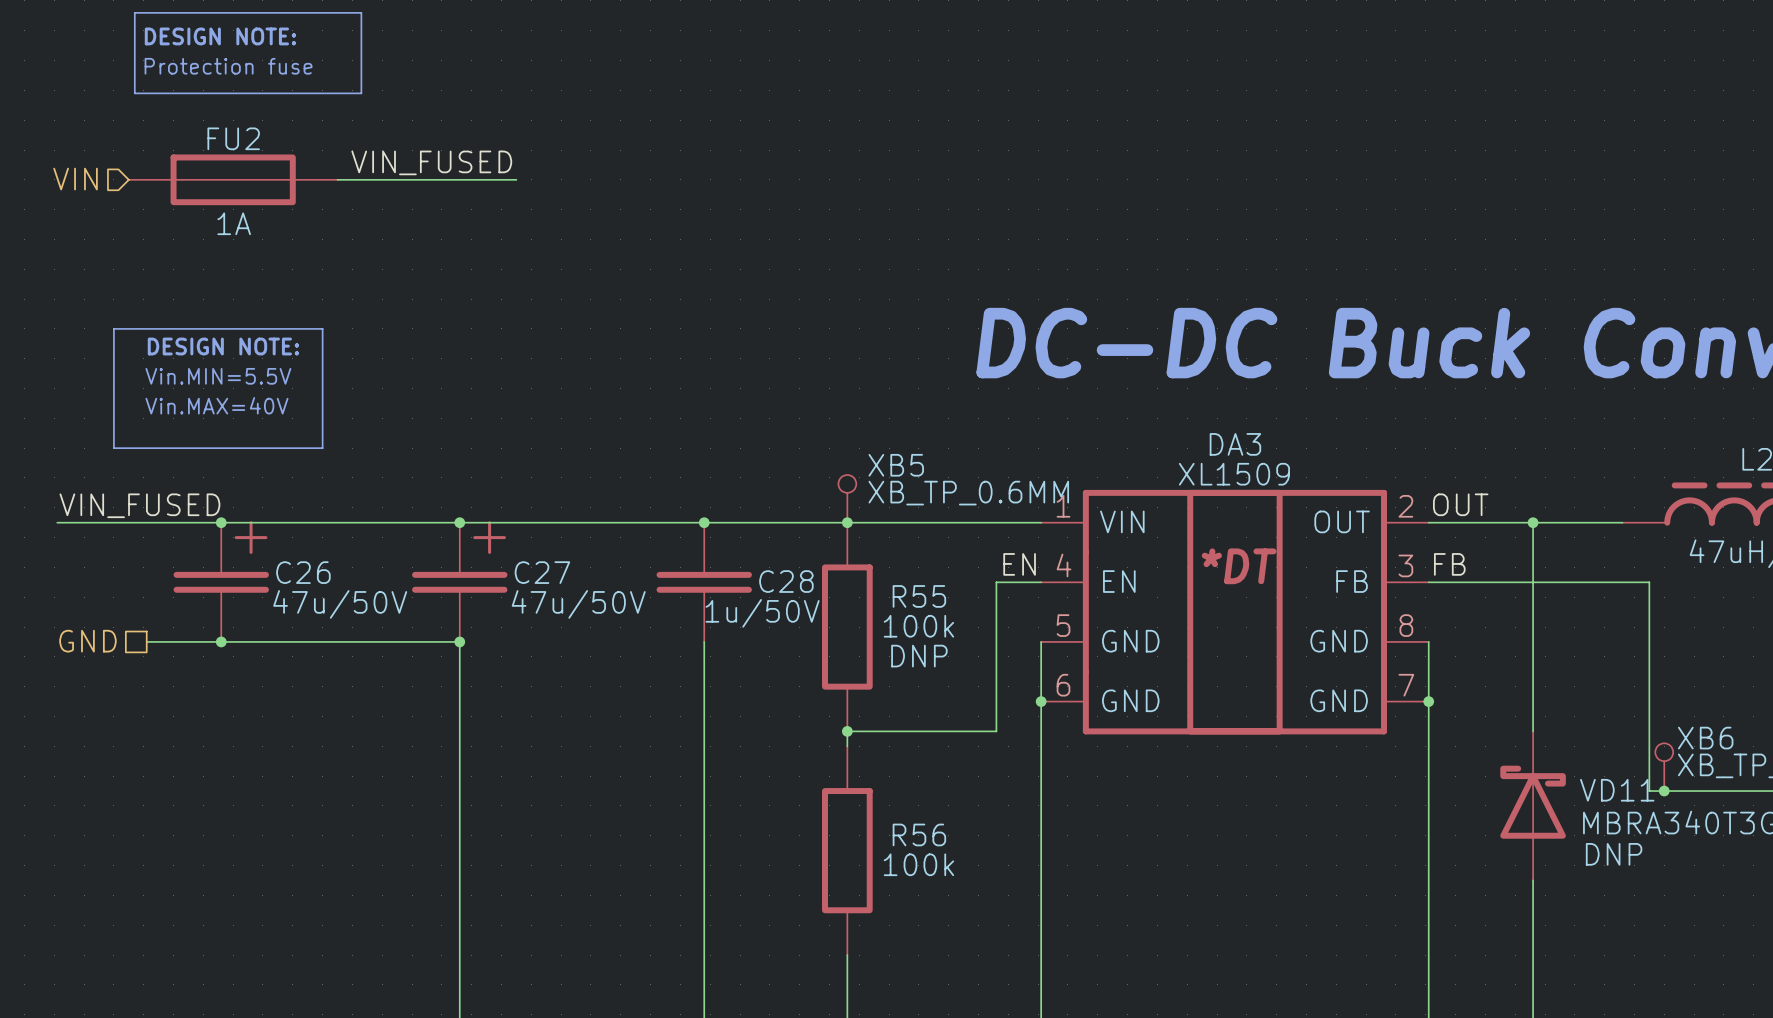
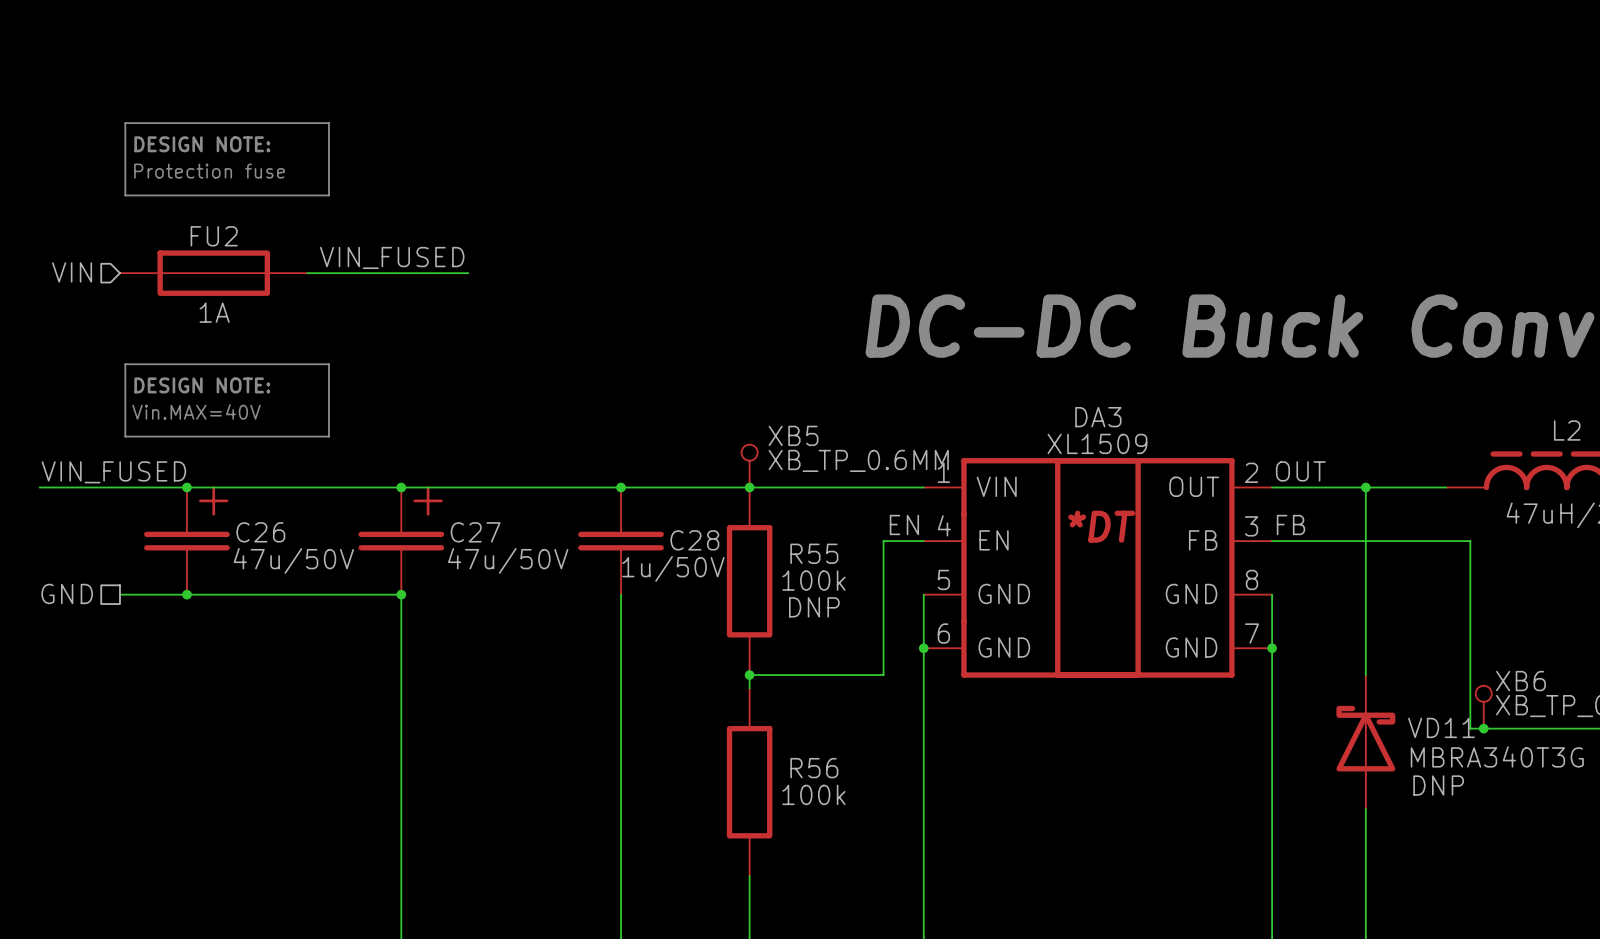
line: (134, 12) (134, 93) (361, 93) (361, 12) (134, 12) -> (125, 123) (125, 195) (328, 195) (328, 123) (125, 123)
text: DESIGN NOTE: (220, 36) -> none
text position: Protection fuse (228, 66) -> Protection fuse (209, 171)
text: none -> DESIGN NOTE: (202, 144)
label position: VIN_FUSED (431, 162) -> VIN_FUSED (392, 257)
hierarchical label position: VIN (75, 179) -> VIN (72, 272)
FU2 position: (233, 179) -> (213, 273)
wire: (337, 179) (516, 179) -> (307, 273) (468, 273)
line: (113, 328) (113, 448) (322, 448) (322, 328) (113, 328) -> none
text position: DESIGN NOTE: (223, 346) -> DESIGN NOTE: (202, 385)
text: Vin.MIN=5.5V (218, 376) -> none
line: none -> (125, 364) (125, 436) (328, 436) (328, 364) (125, 364)
text position: Vin.MAX=40V (216, 405) -> Vin.MAX=40V (196, 411)

